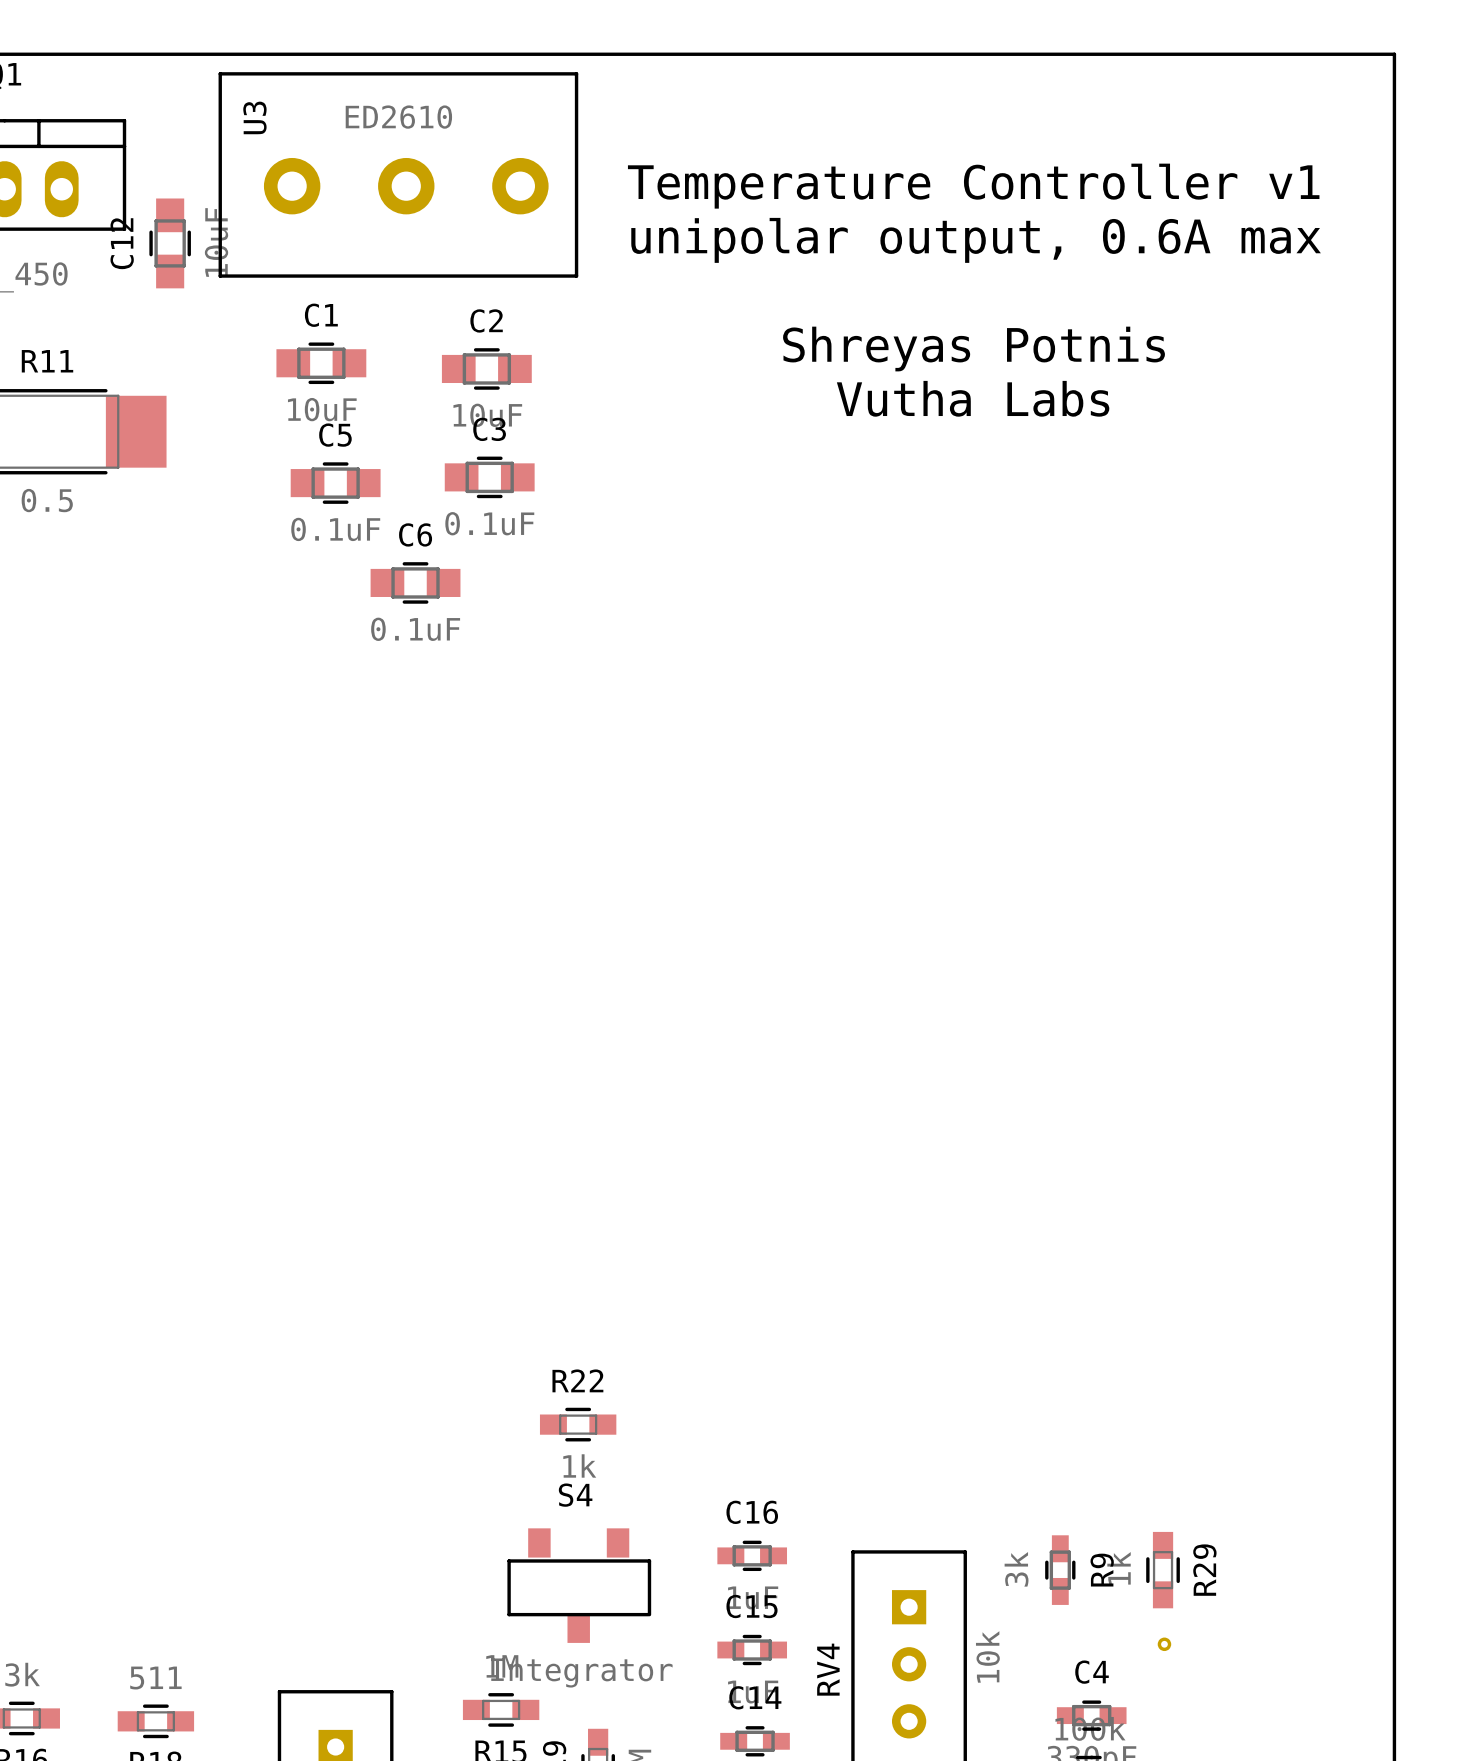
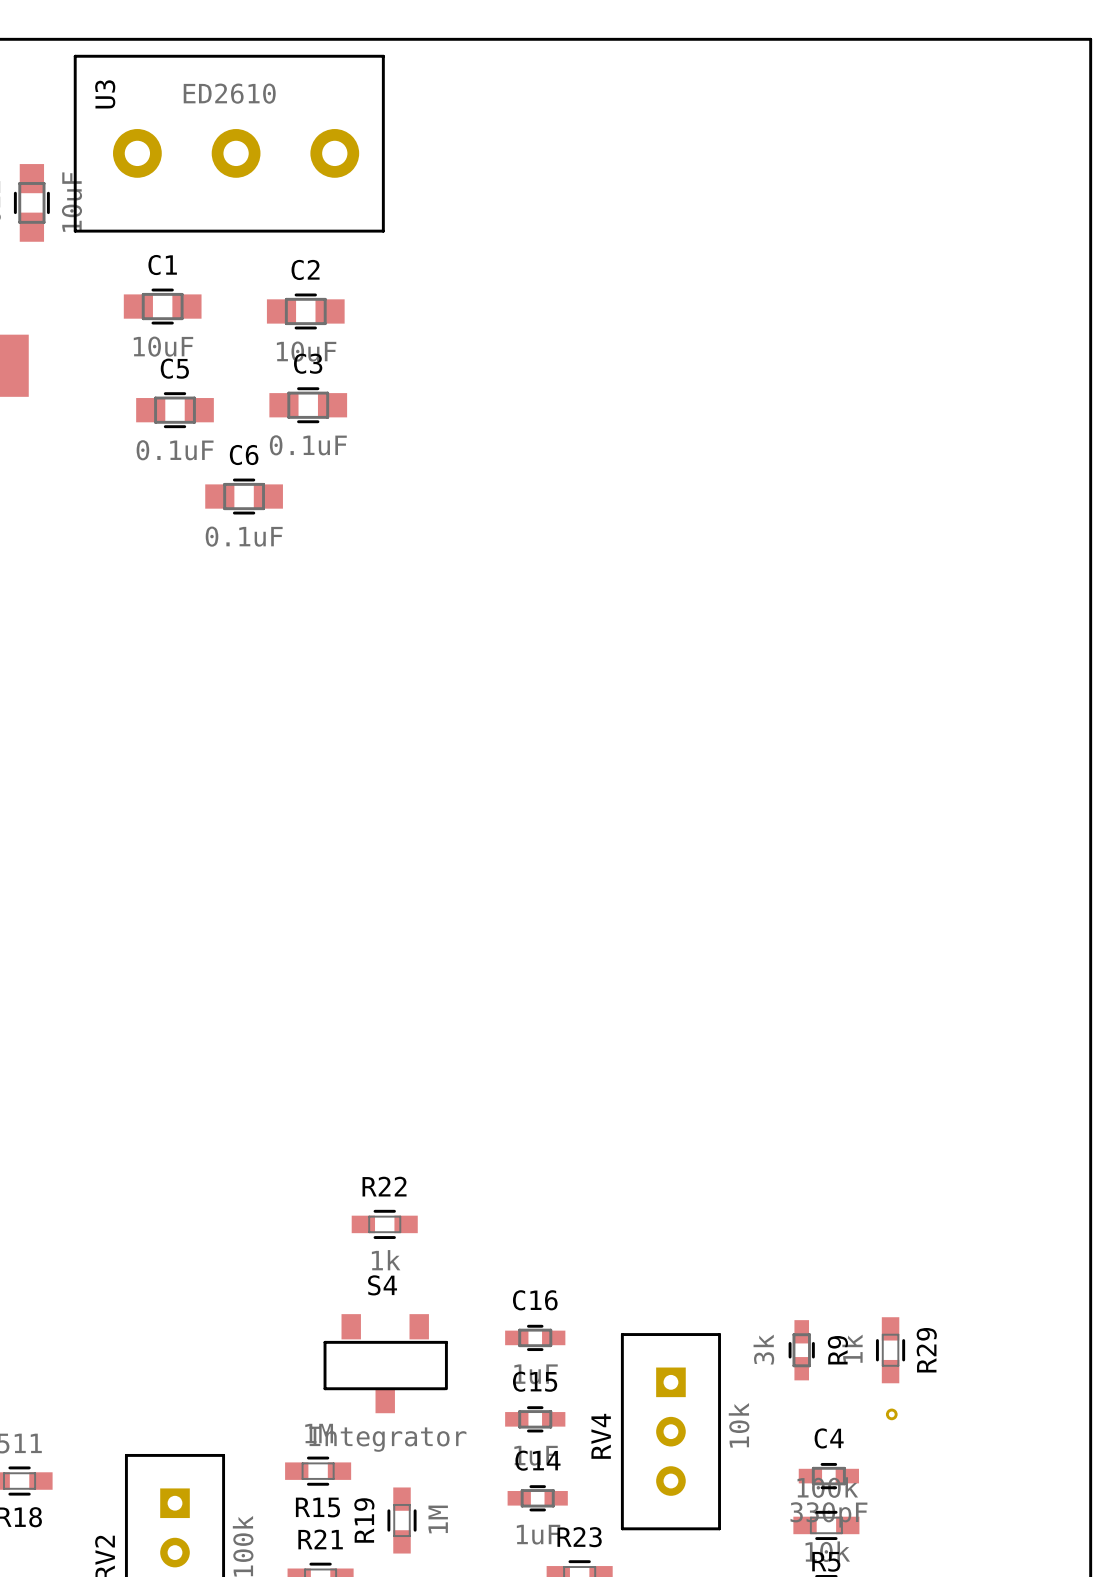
text: Temperature Controller v1 (973, 186) -> none
text: unipolar output, 0.6A max (976, 240) -> none
text: Shreyas Potnis (974, 349) -> none
text: Vutha Labs (973, 398) -> none

